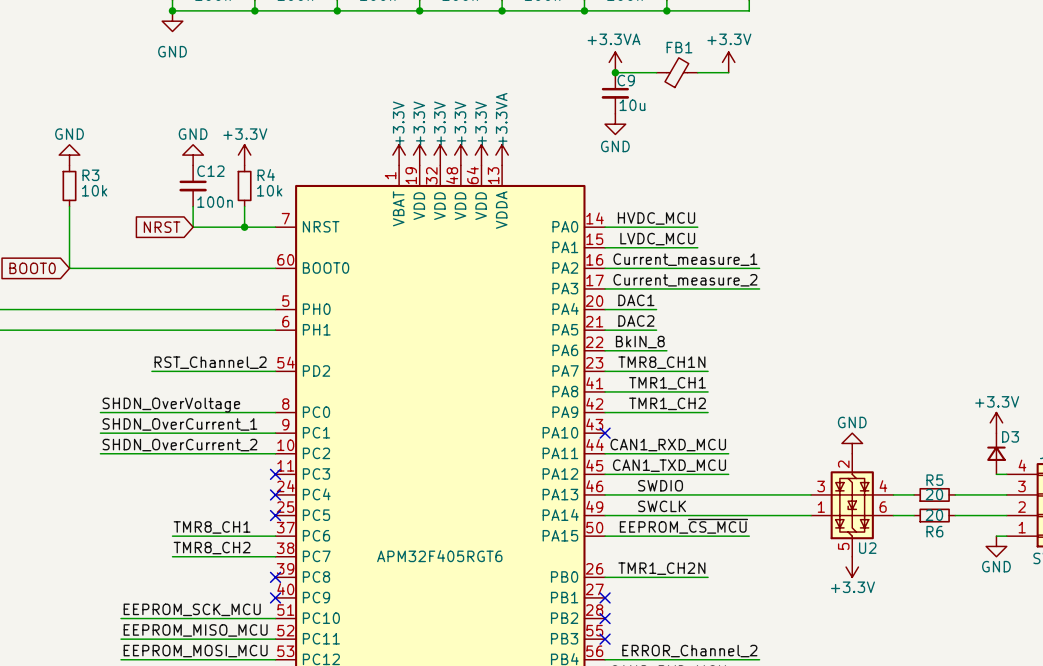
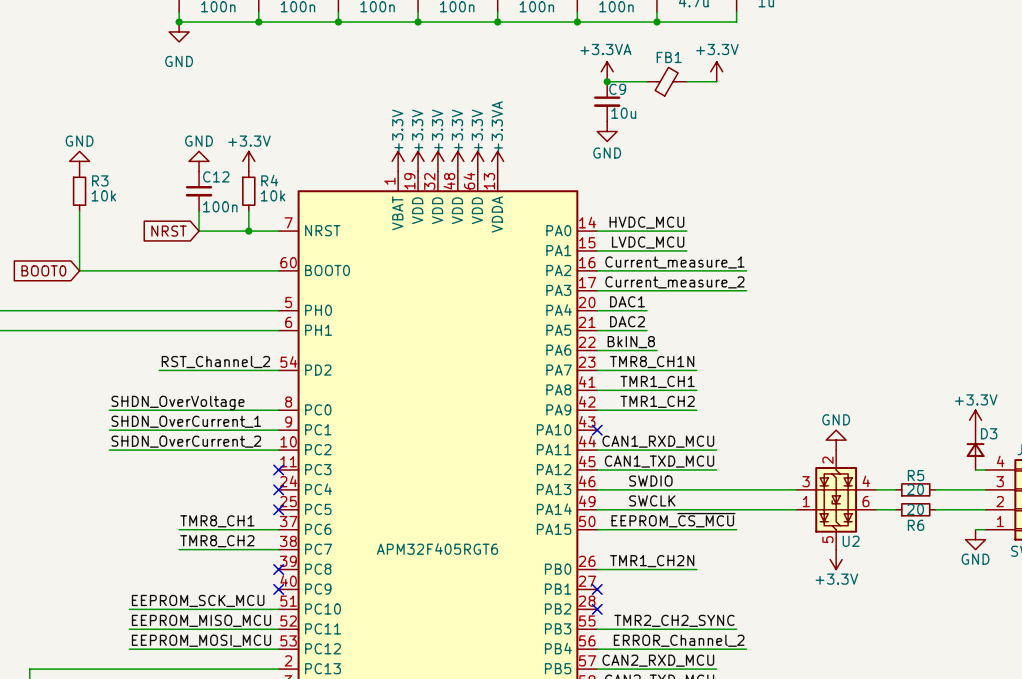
label: none -> TMR2_CH2_SYNC (674, 620)
wire: none -> (597, 629) (736, 629)
no-connect mark: (605, 639) -> none

